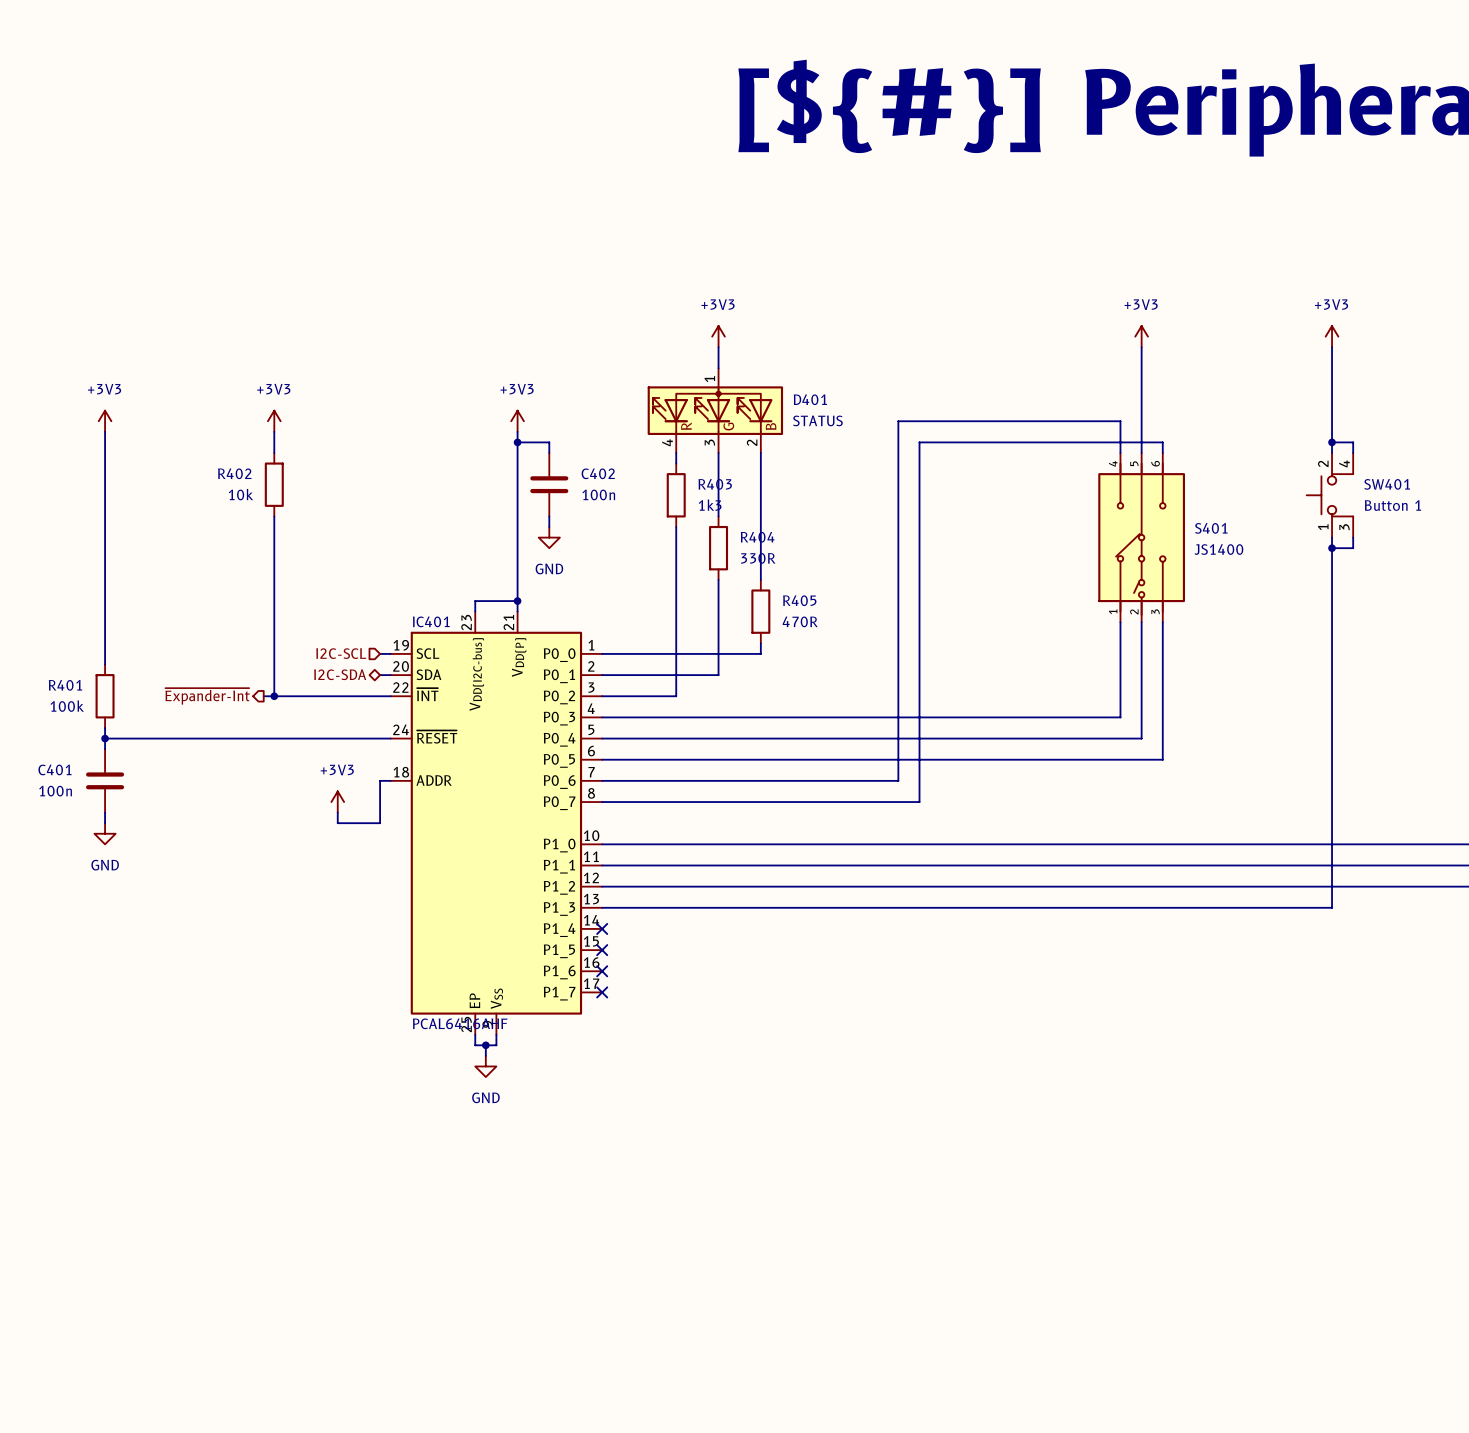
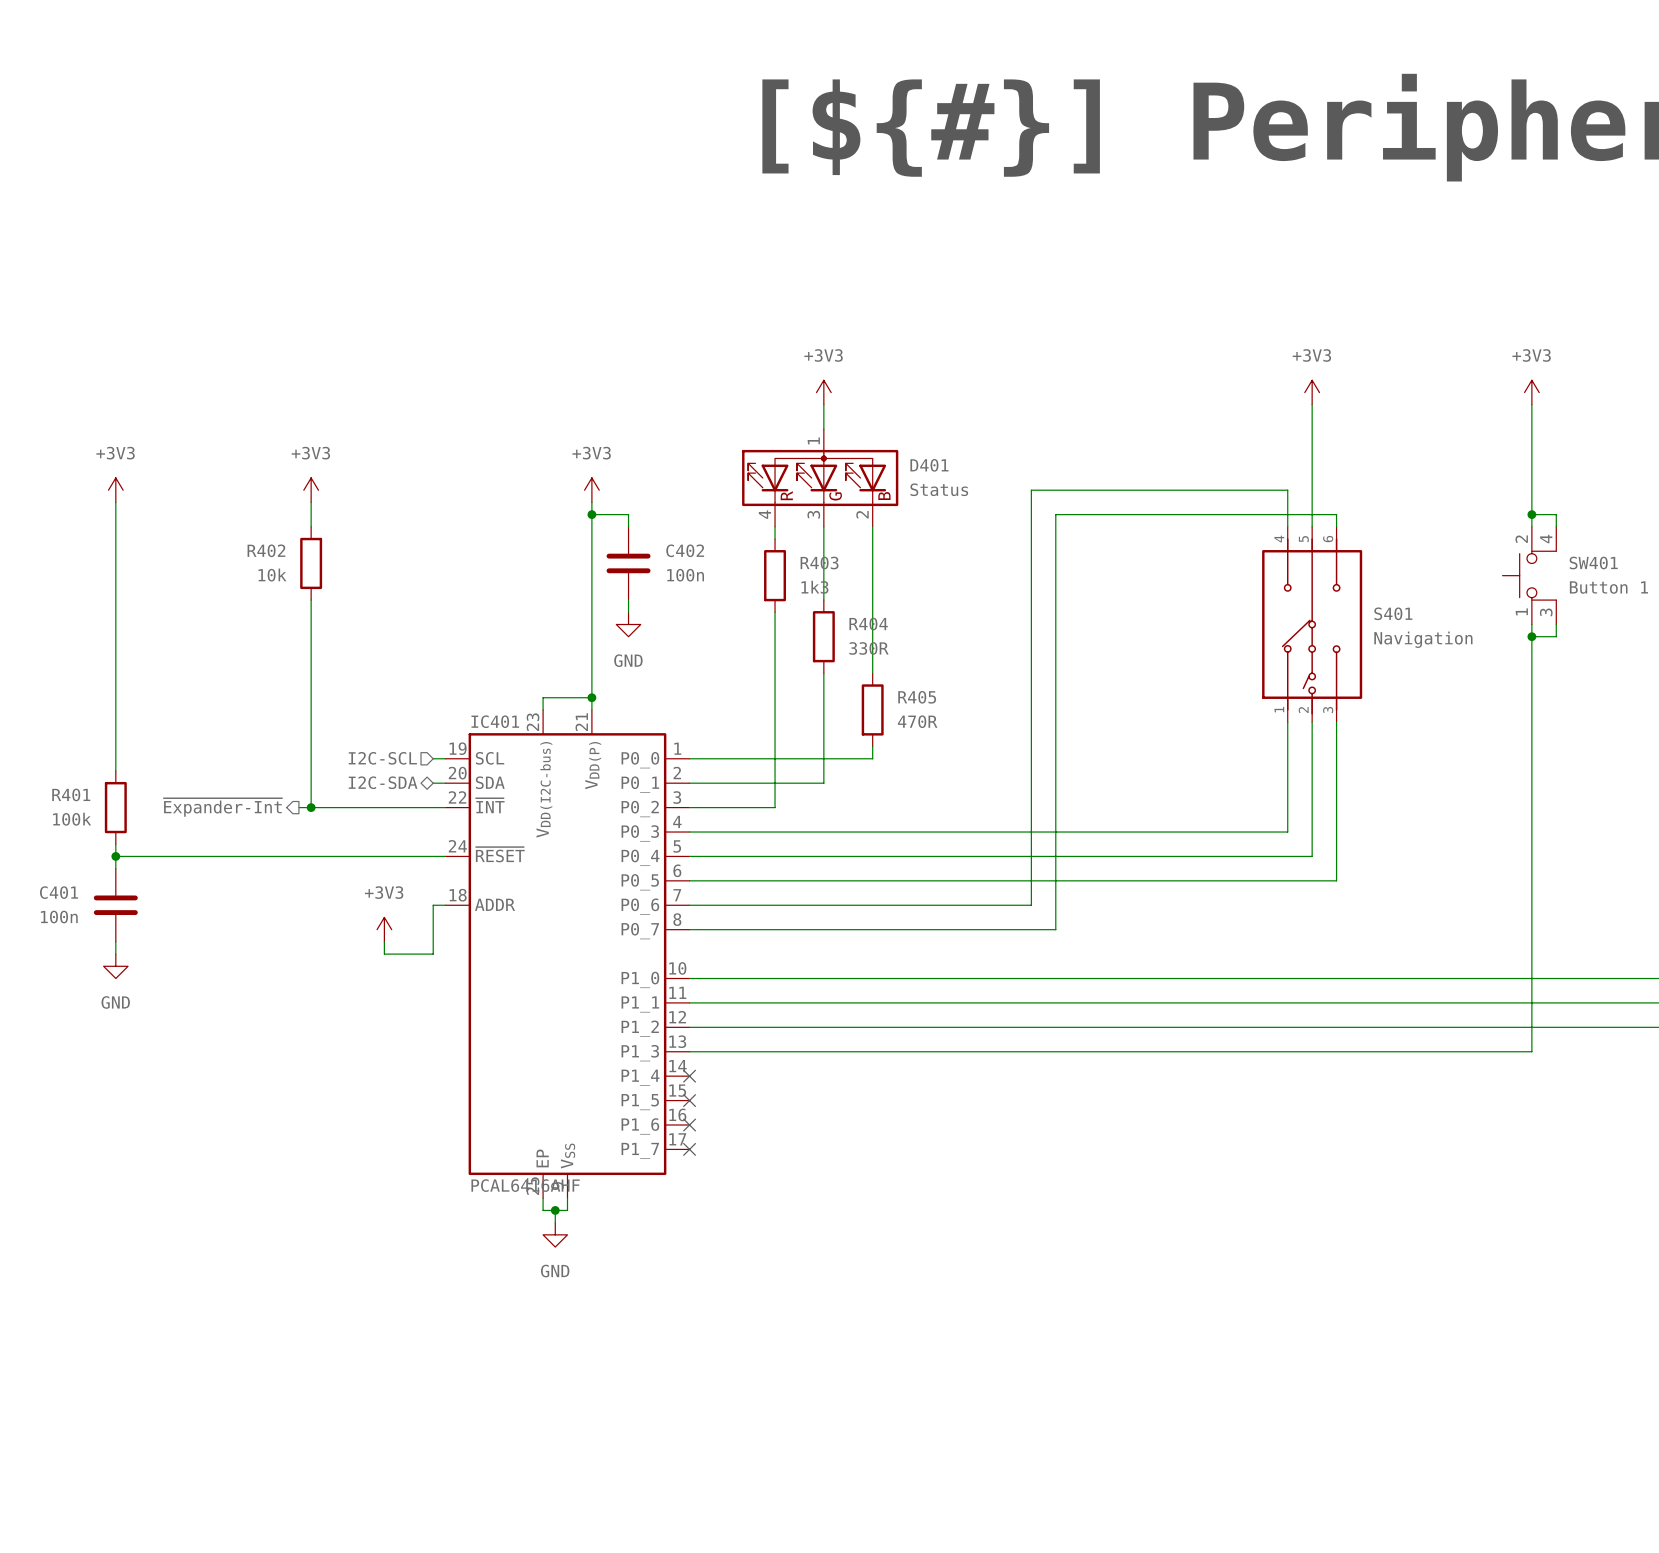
D401 value: STATUS (817, 420) -> Status (939, 489)
S401 value: JS1400 (1218, 549) -> Navigation (1423, 639)

